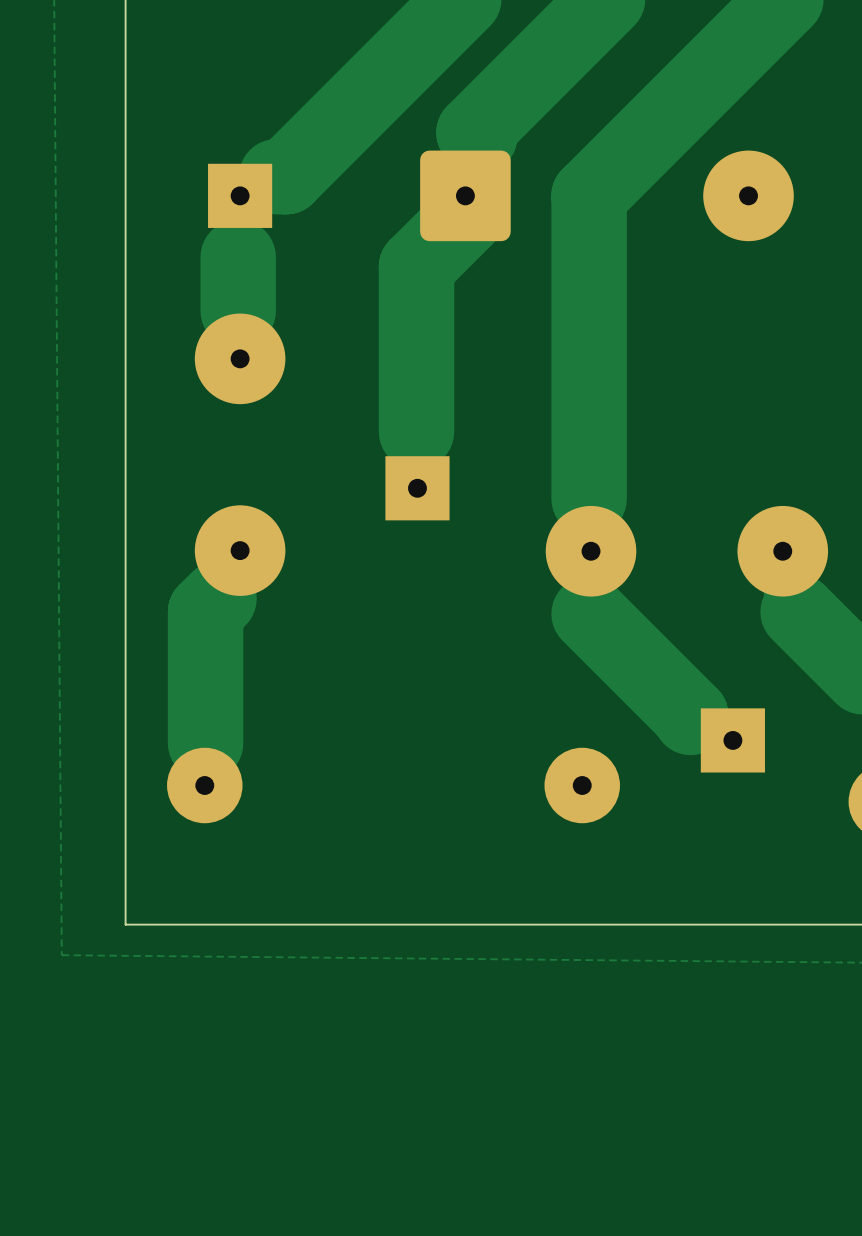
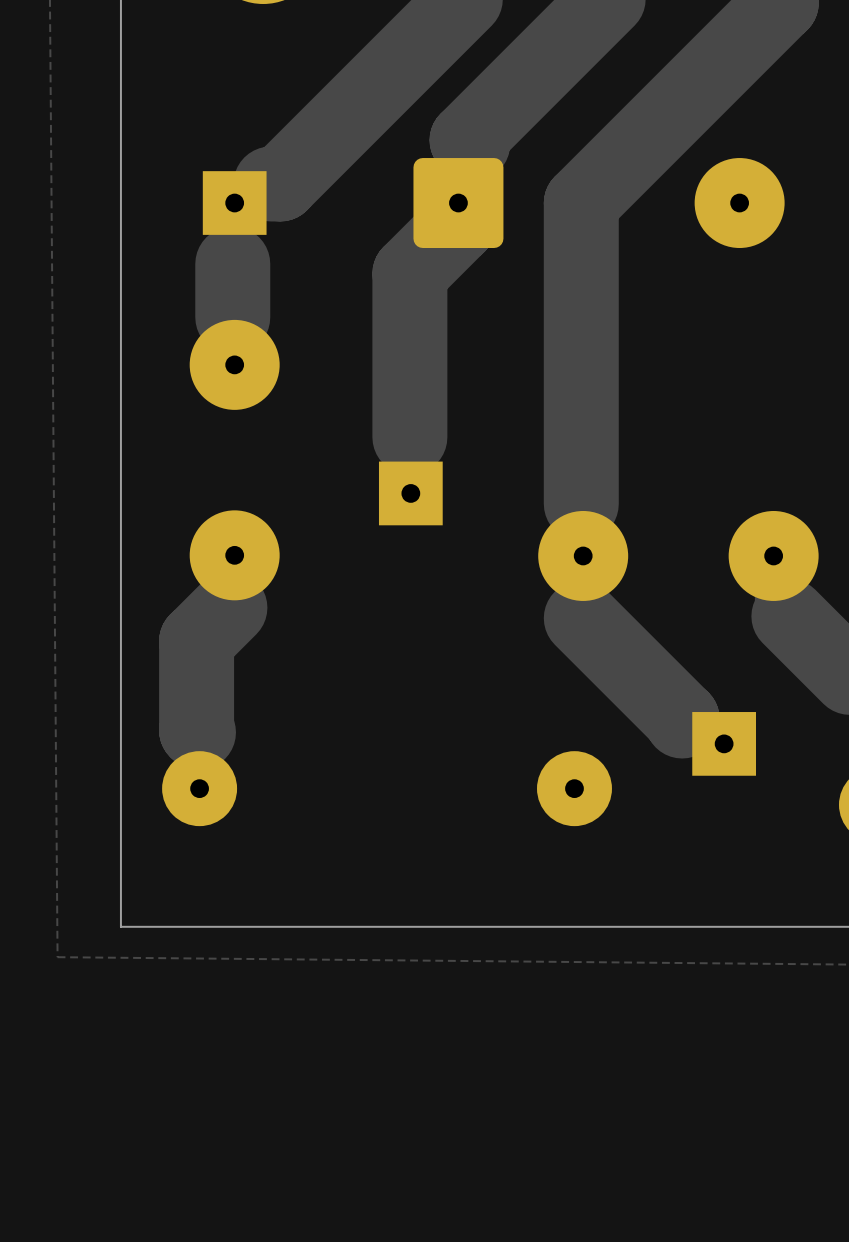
track: (219, 598) (205, 611) (204, 744) -> (234, 555) (234, 602) (196, 641) (196, 730) (199, 733) (199, 747)

